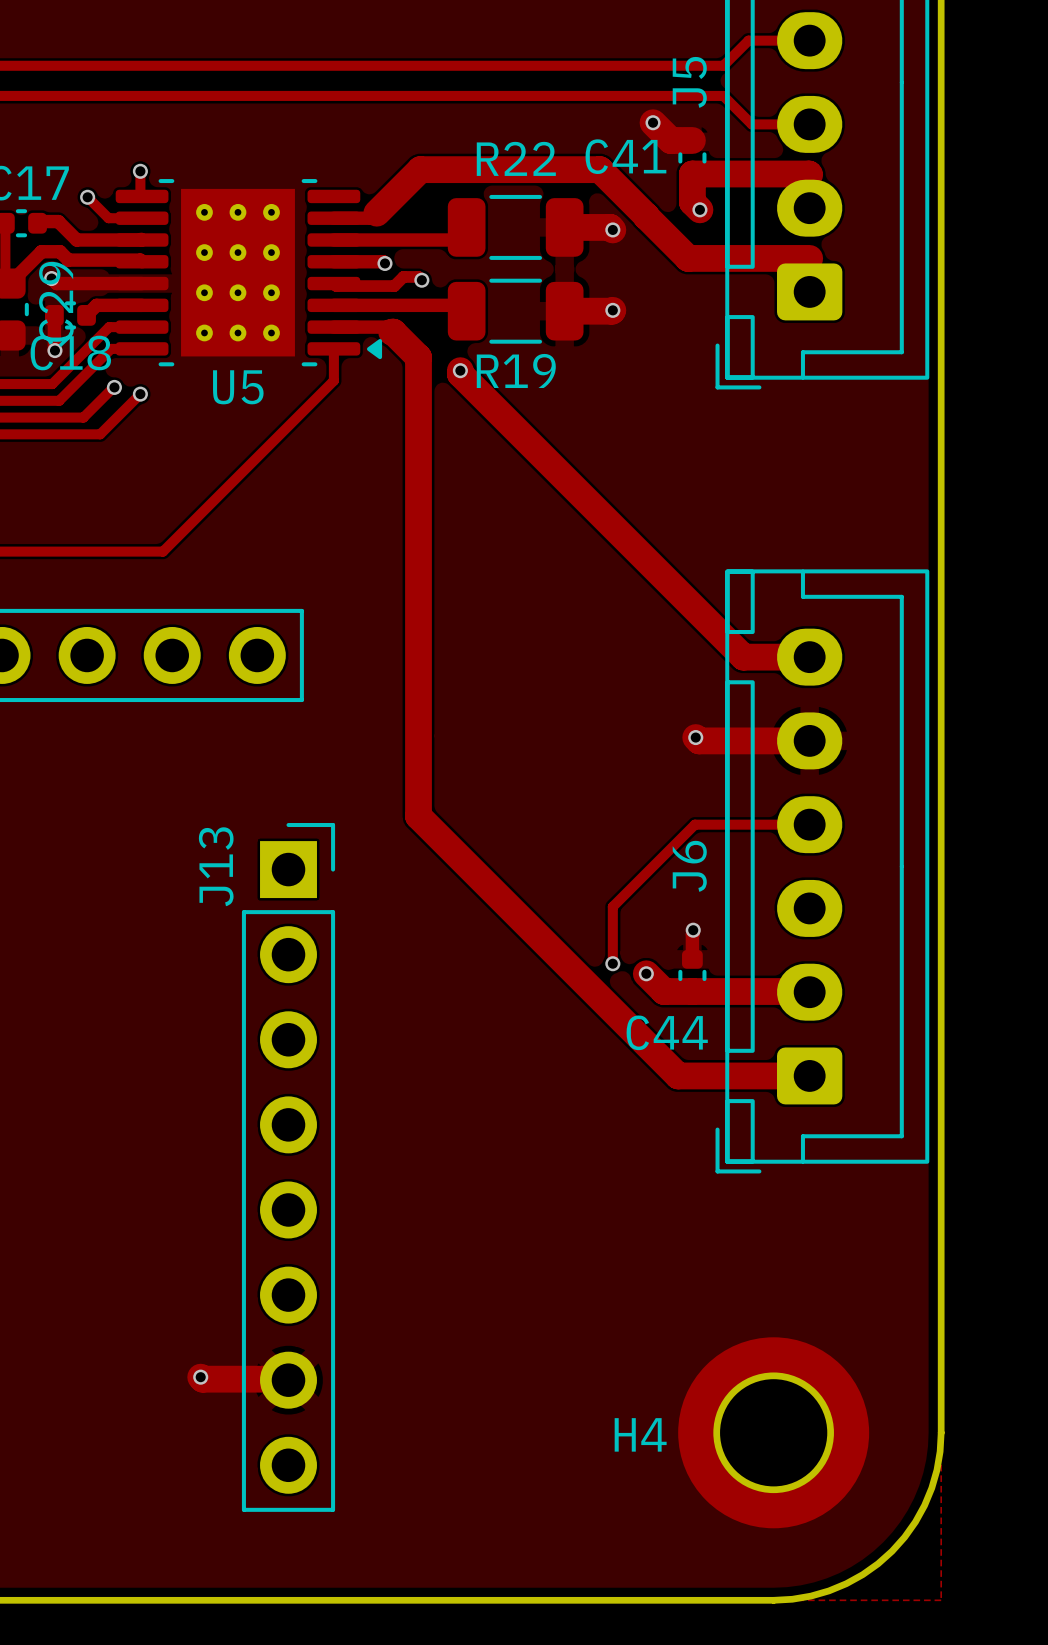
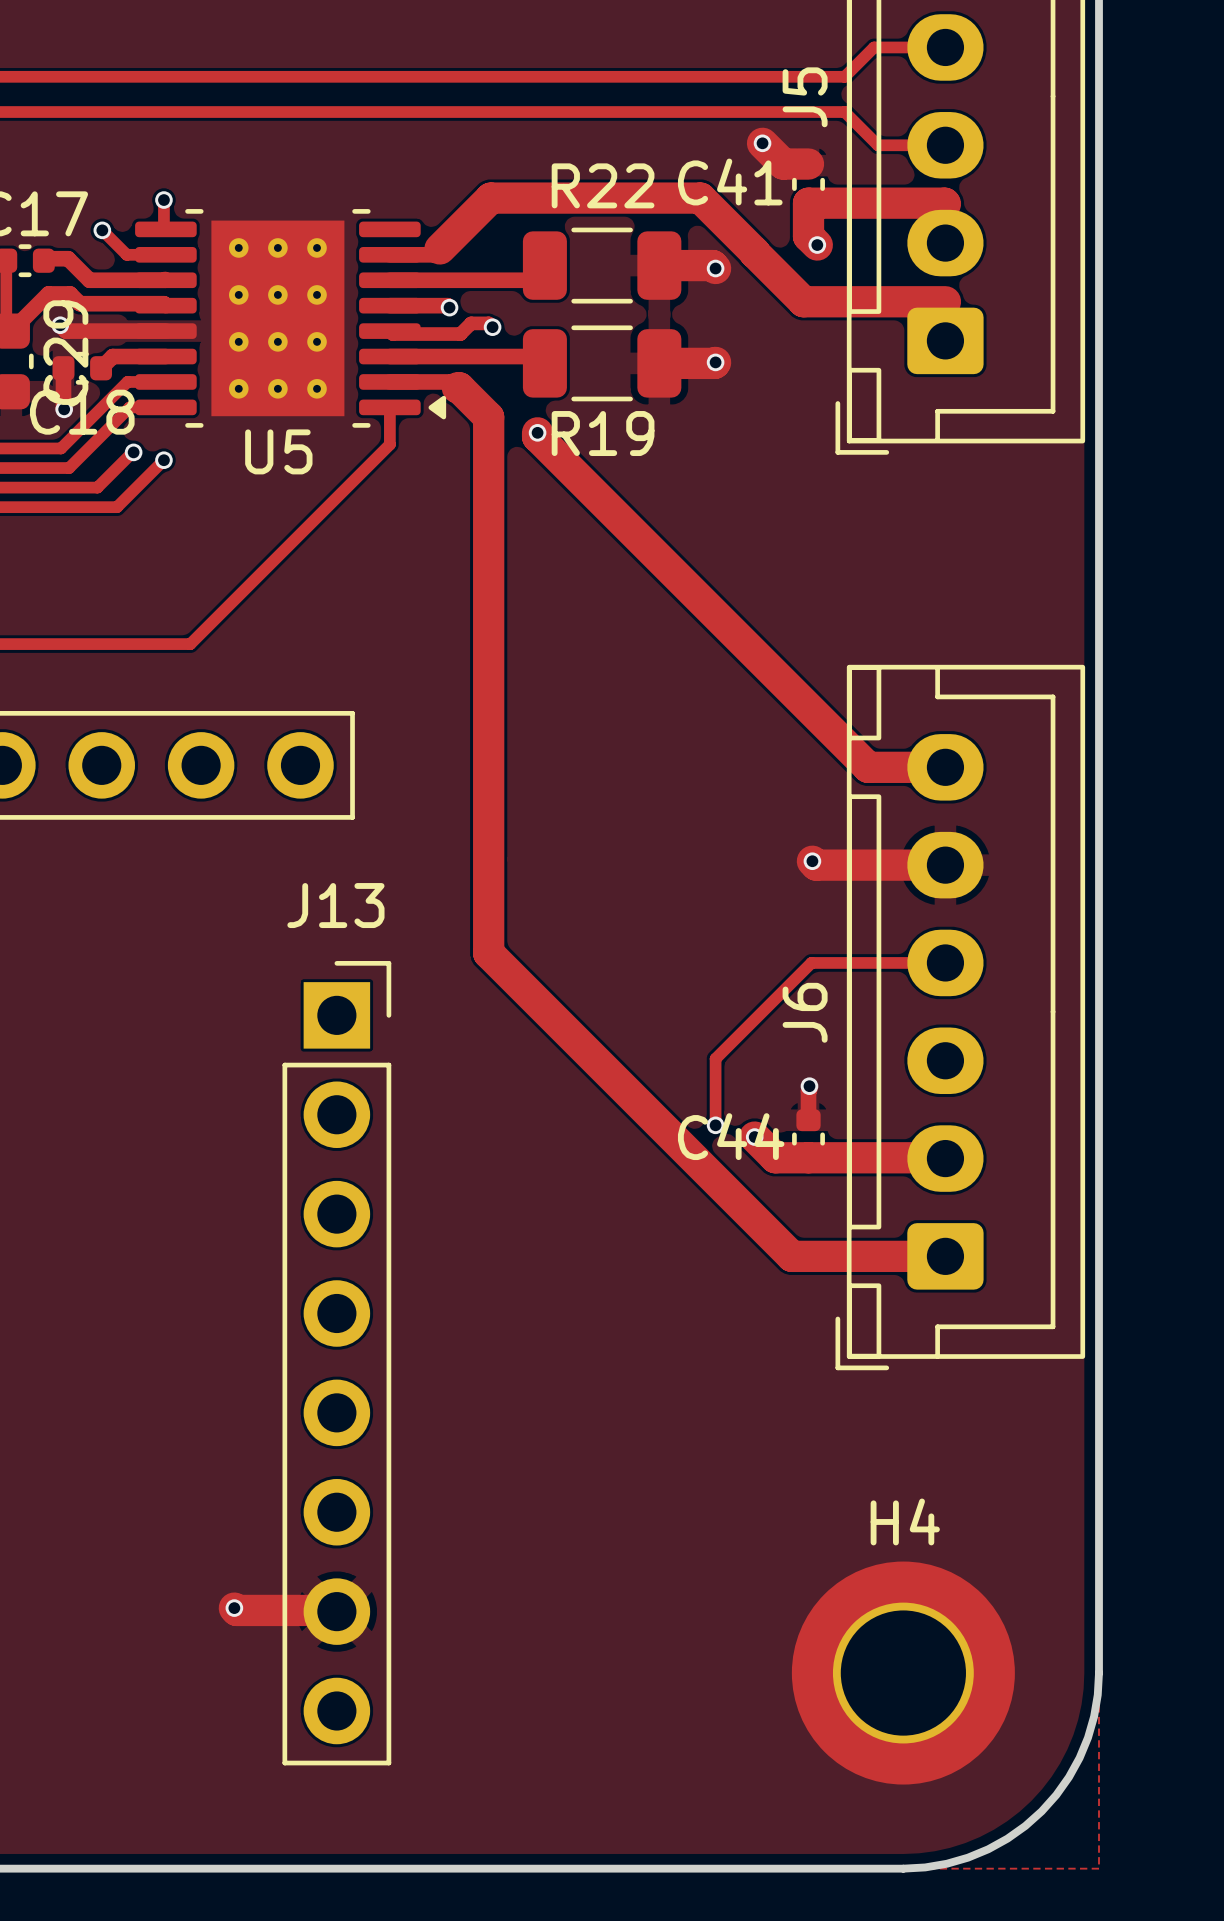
J13 name rotation: 0° (216, 866) -> 90° clockwise (335, 905)
J13 name position: J13 (216, 866) -> J13 (335, 905)
C44 name position: C44 (667, 1032) -> C44 (731, 1136)
H4 name position: H4 (640, 1434) -> H4 (905, 1521)

